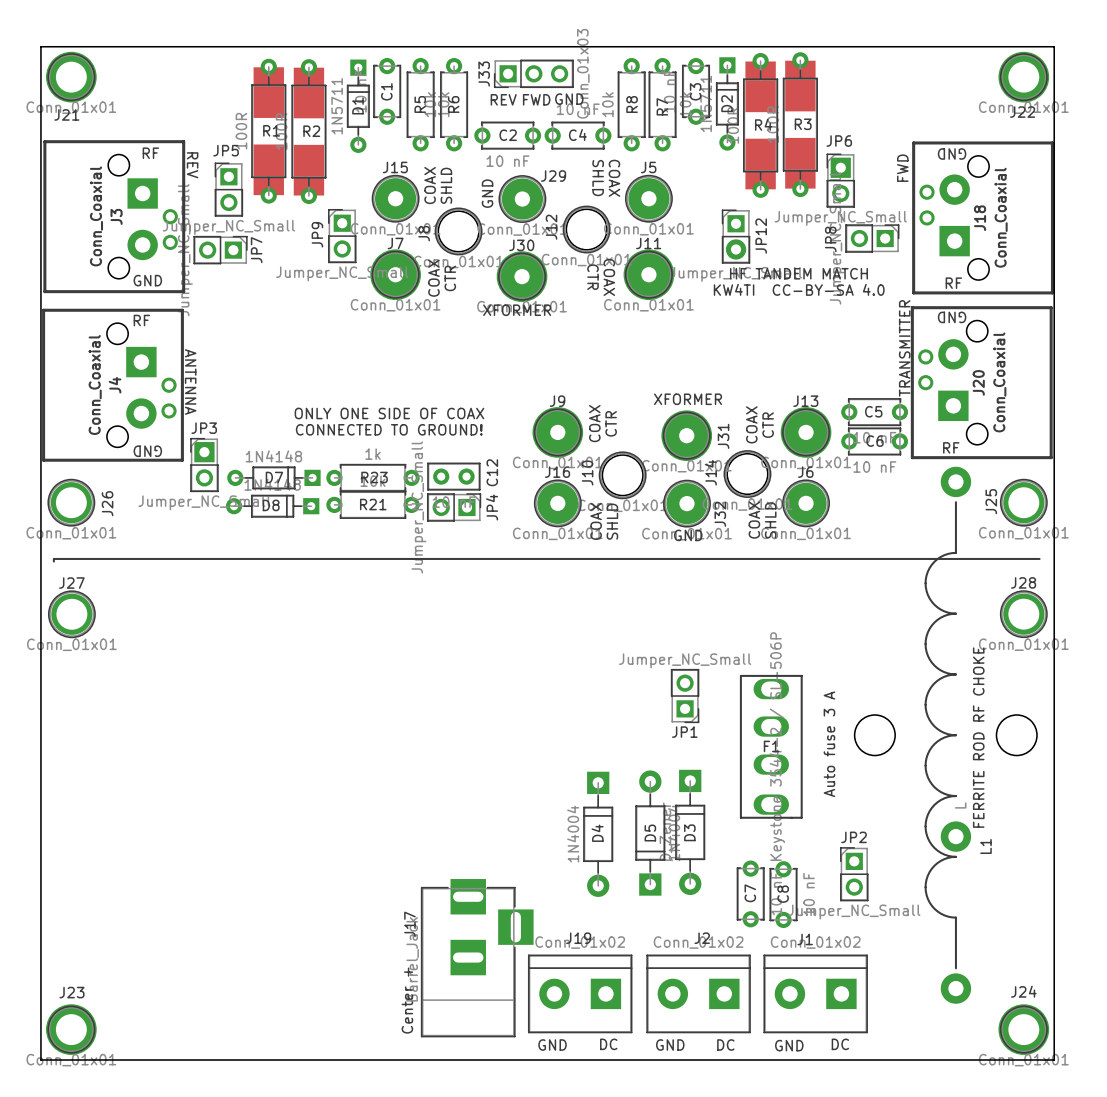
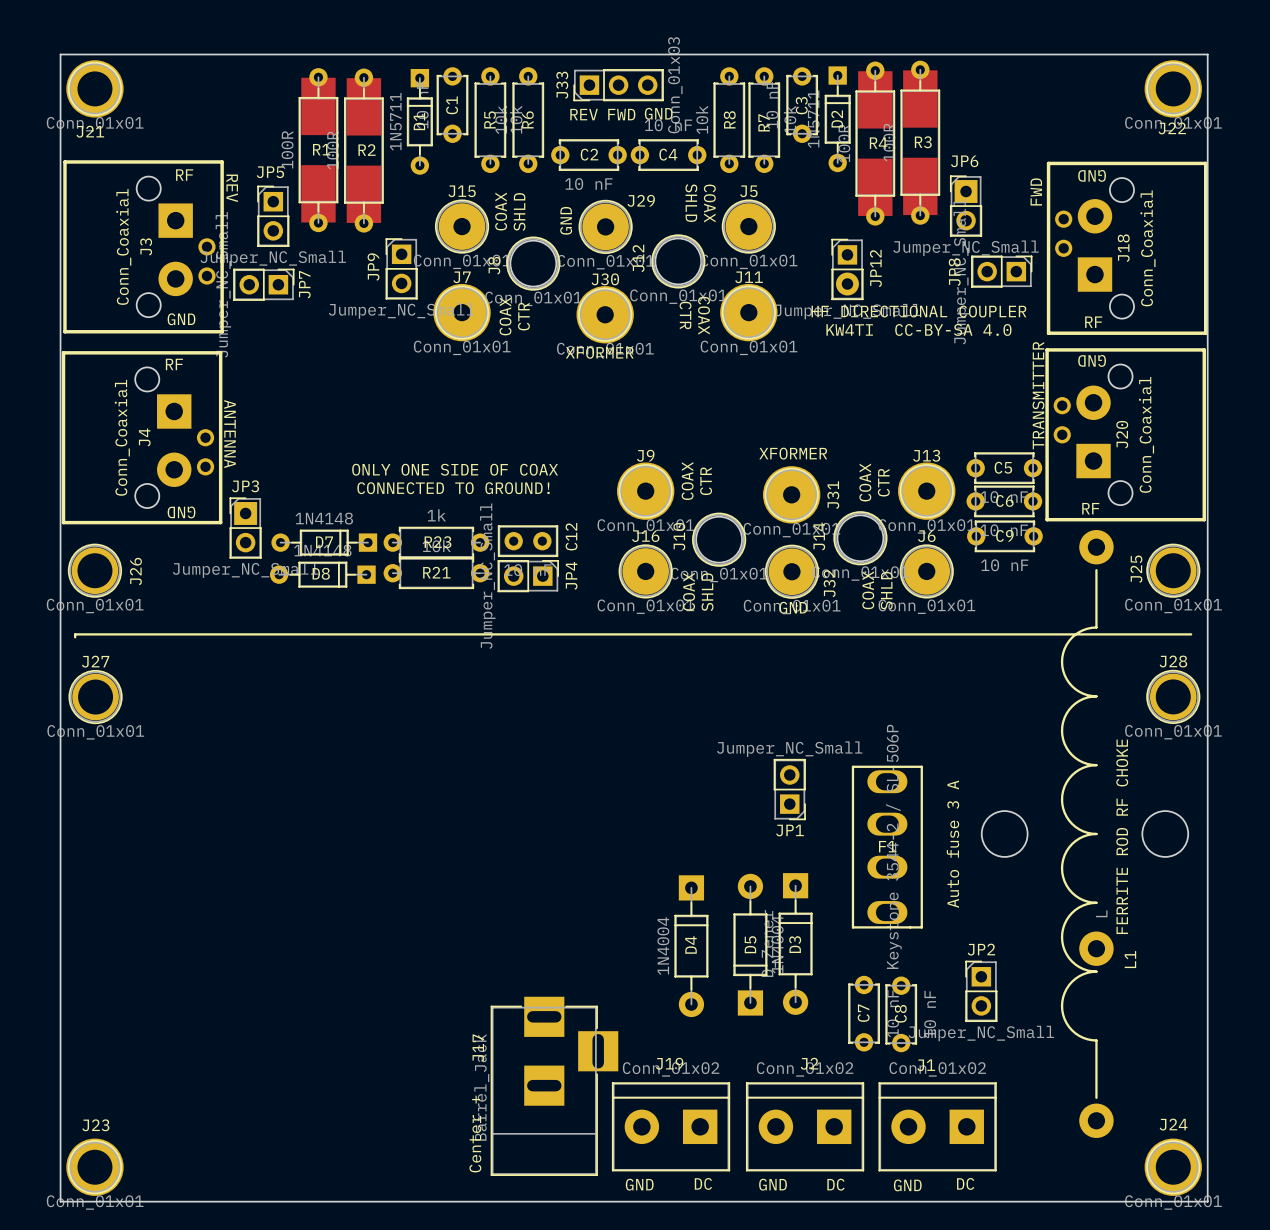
text: HF TANDEM MATCH (798, 273) -> HF DIRECTIONAL COUPLER (918, 311)
C9: none -> 10 nF (1004, 536)

